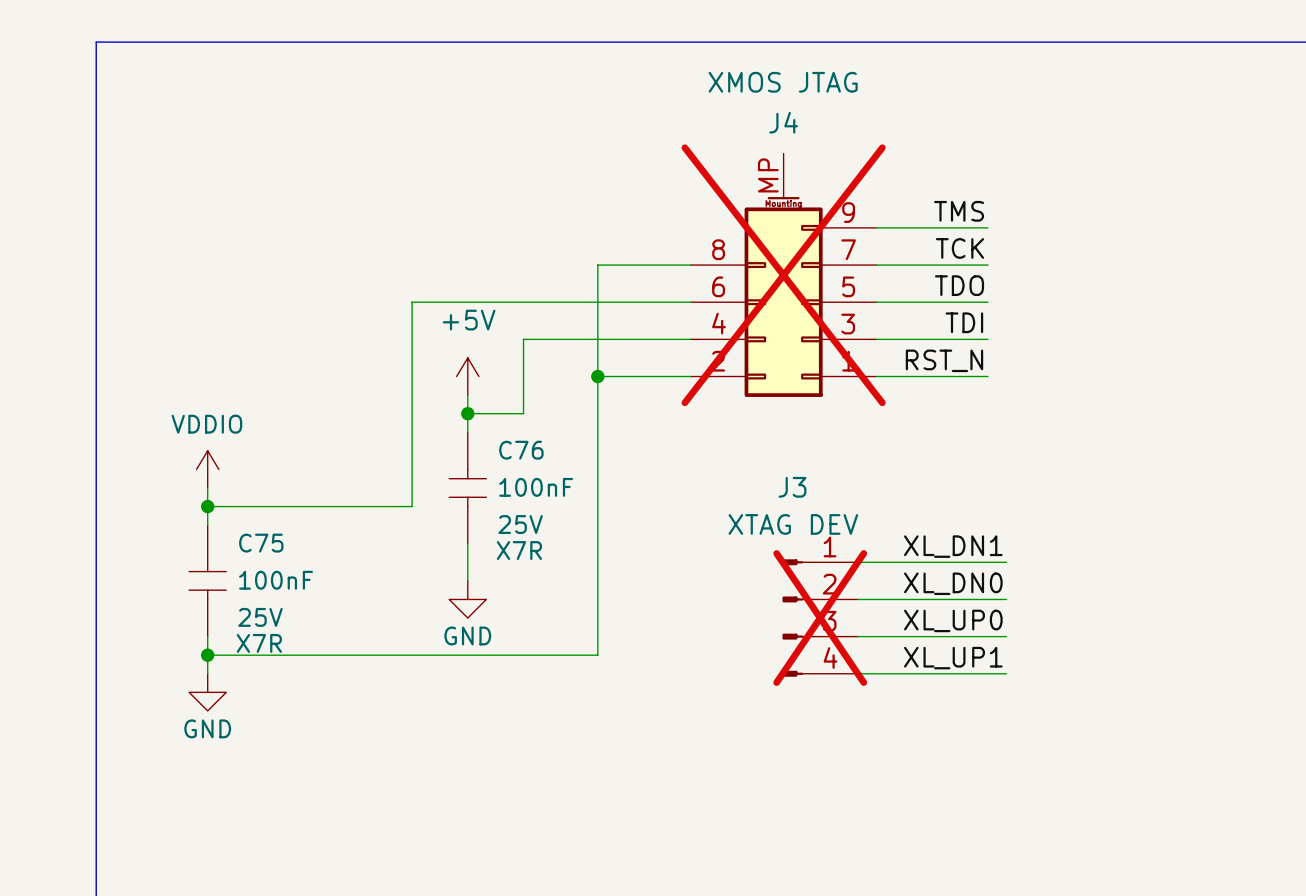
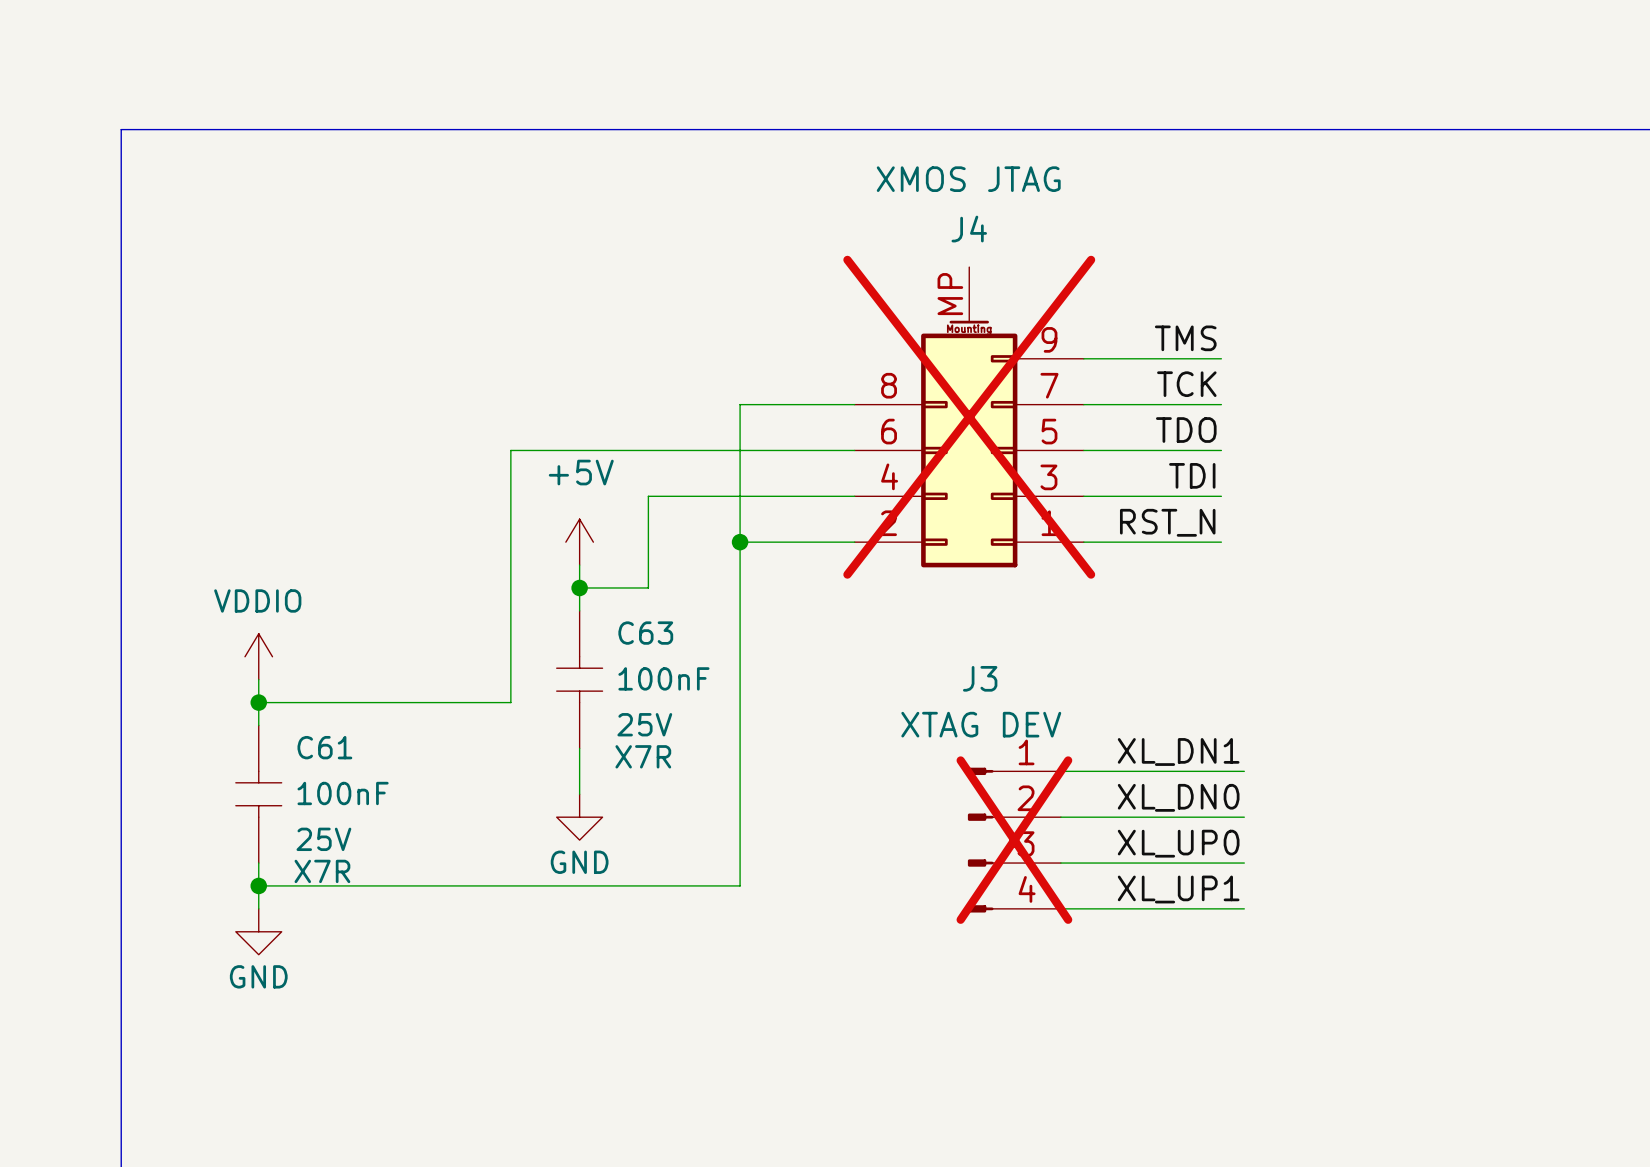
C76 name: C76 (521, 450) -> C63 (645, 633)
C75 name: C75 (261, 543) -> C61 (324, 747)

